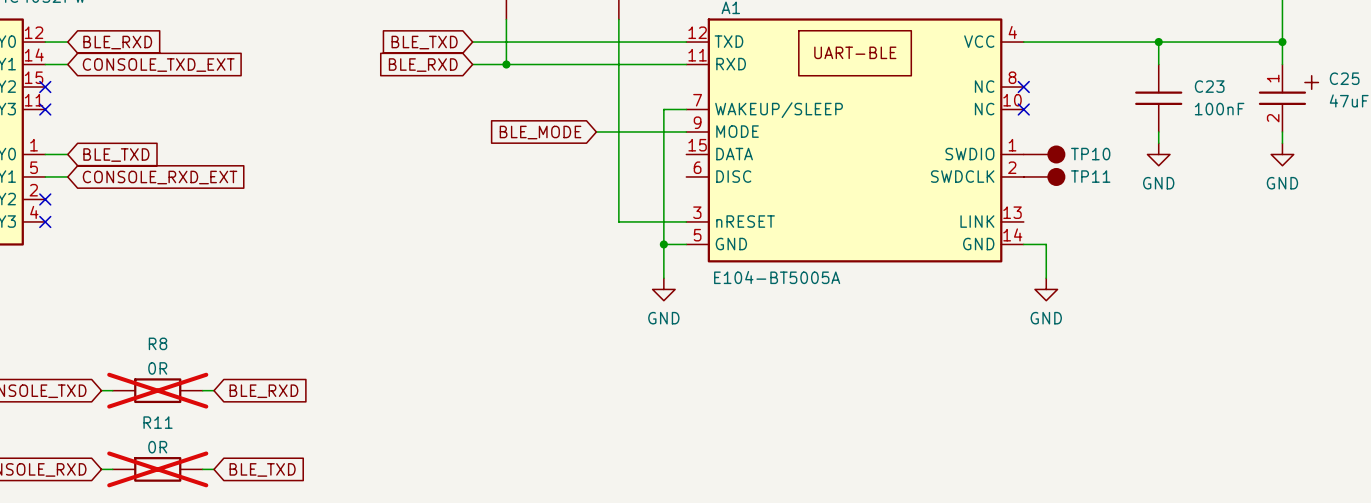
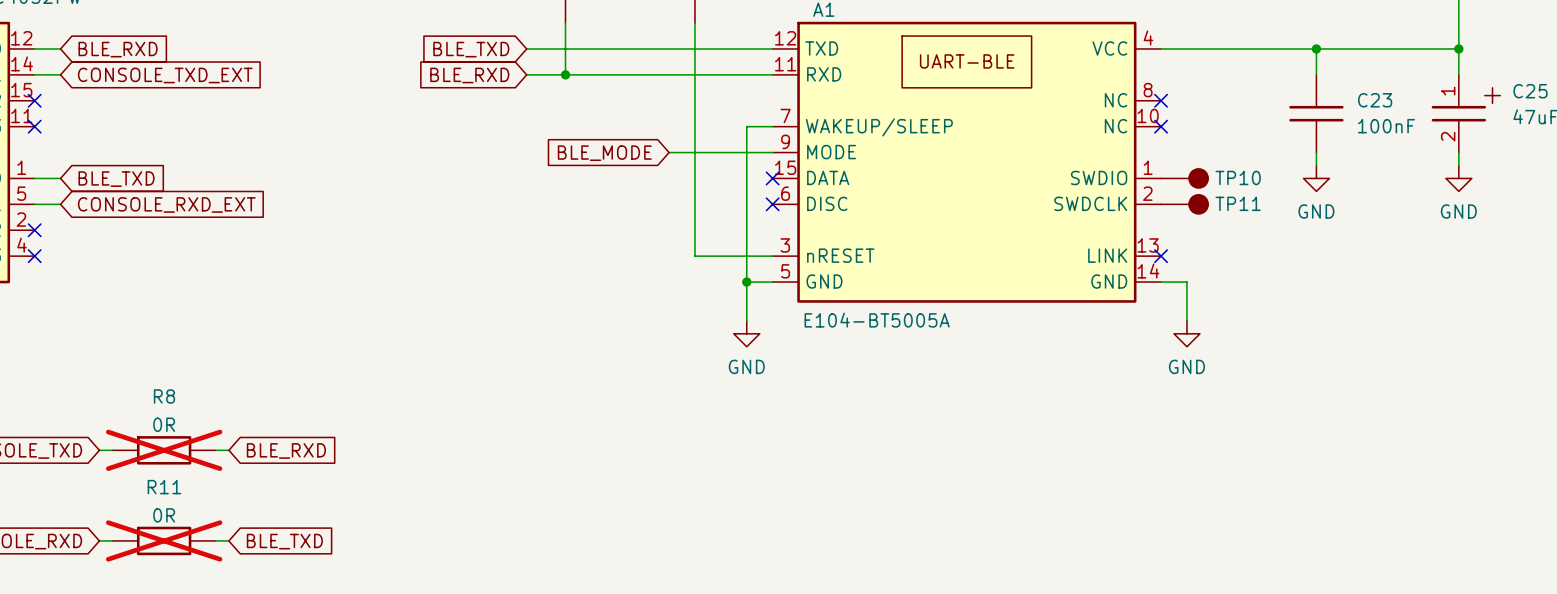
no-connect mark: none -> (772, 178)
no-connect mark: none -> (772, 204)
no-connect mark: none -> (1161, 256)

